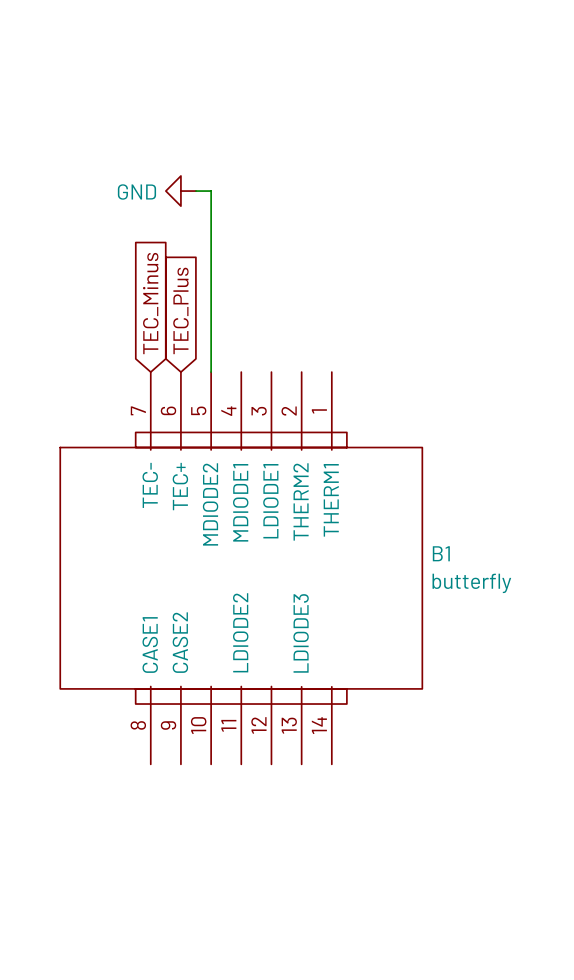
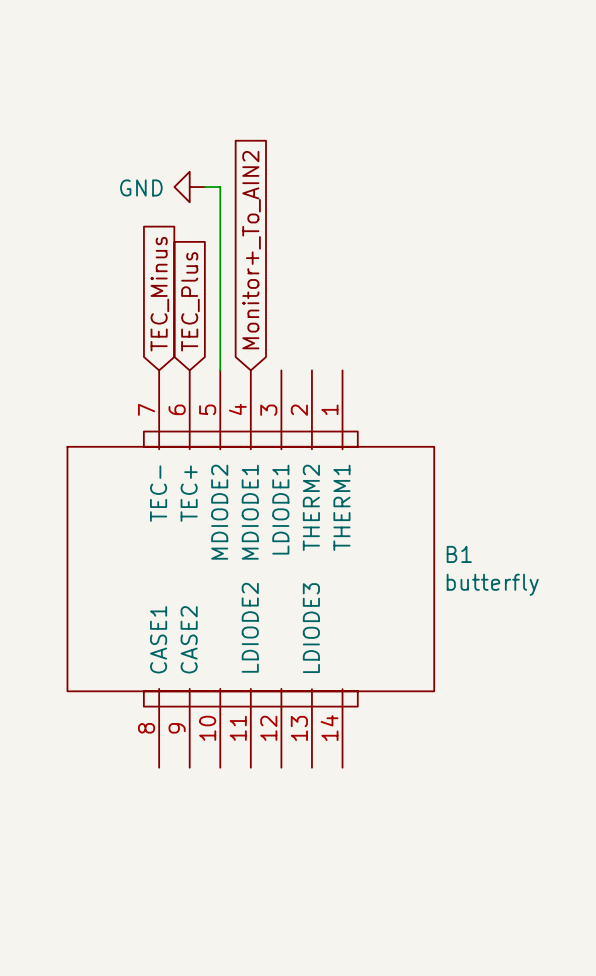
global label: none -> Monitor+_To_AIN2 (251, 250)

